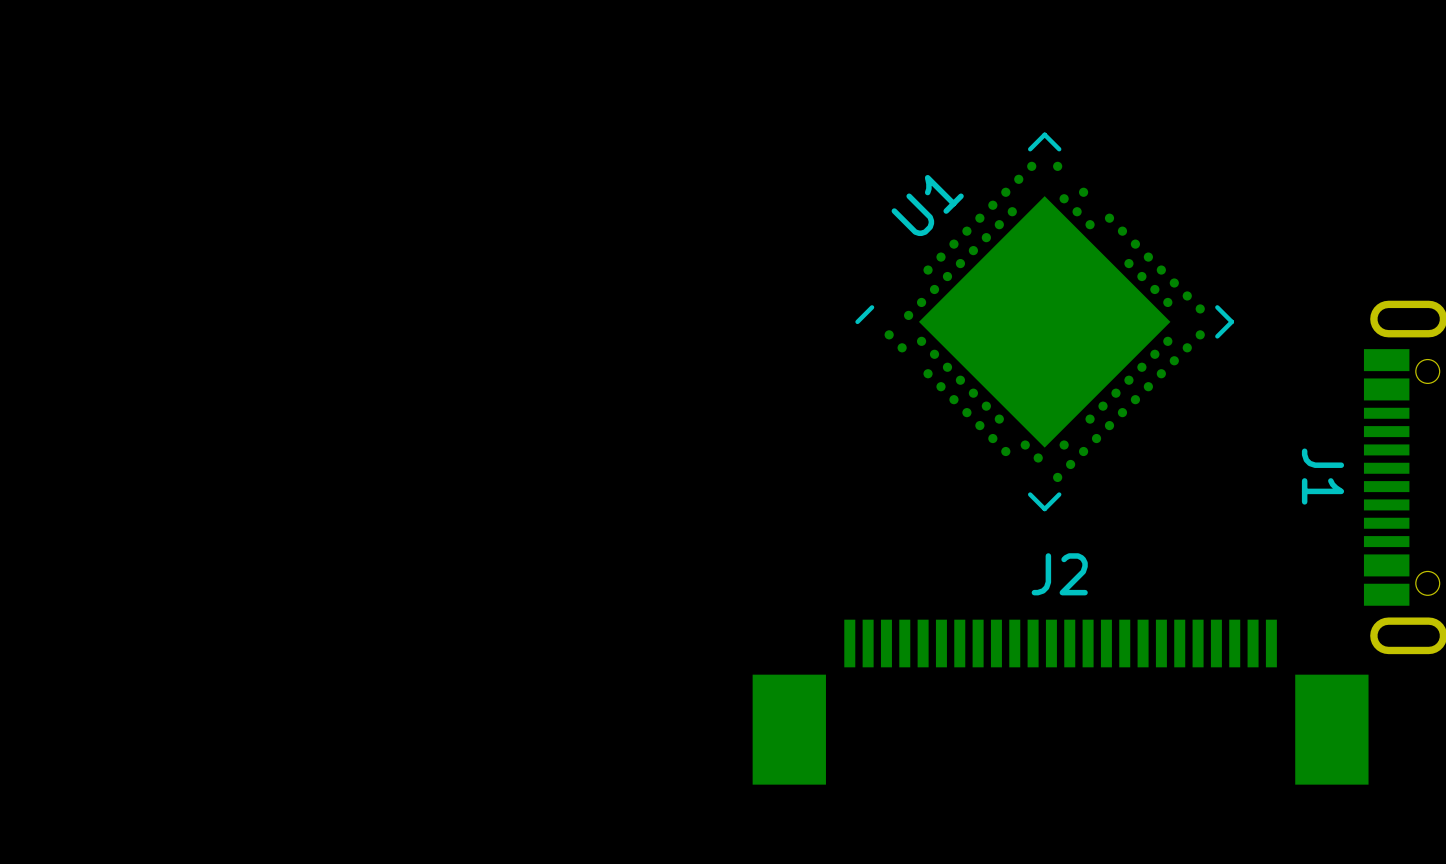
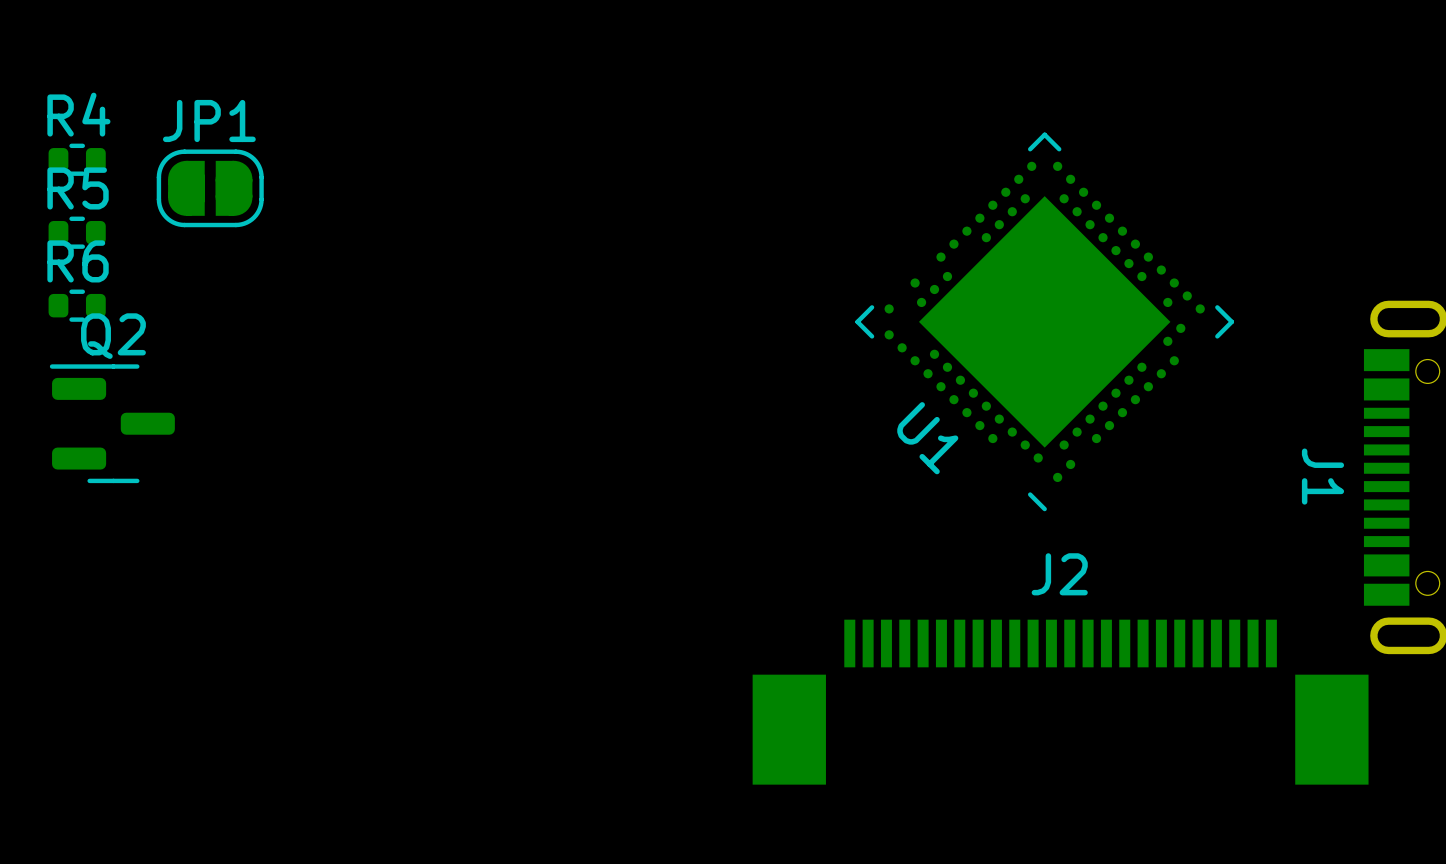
R4: none -> (77, 159)
JP1: none -> (210, 188)
R5: none -> (77, 232)
R6: none -> (77, 305)
U1 rotation: 0° (1044, 321) -> 90° counterclockwise (1044, 321)
Q2: none -> (112, 423)

